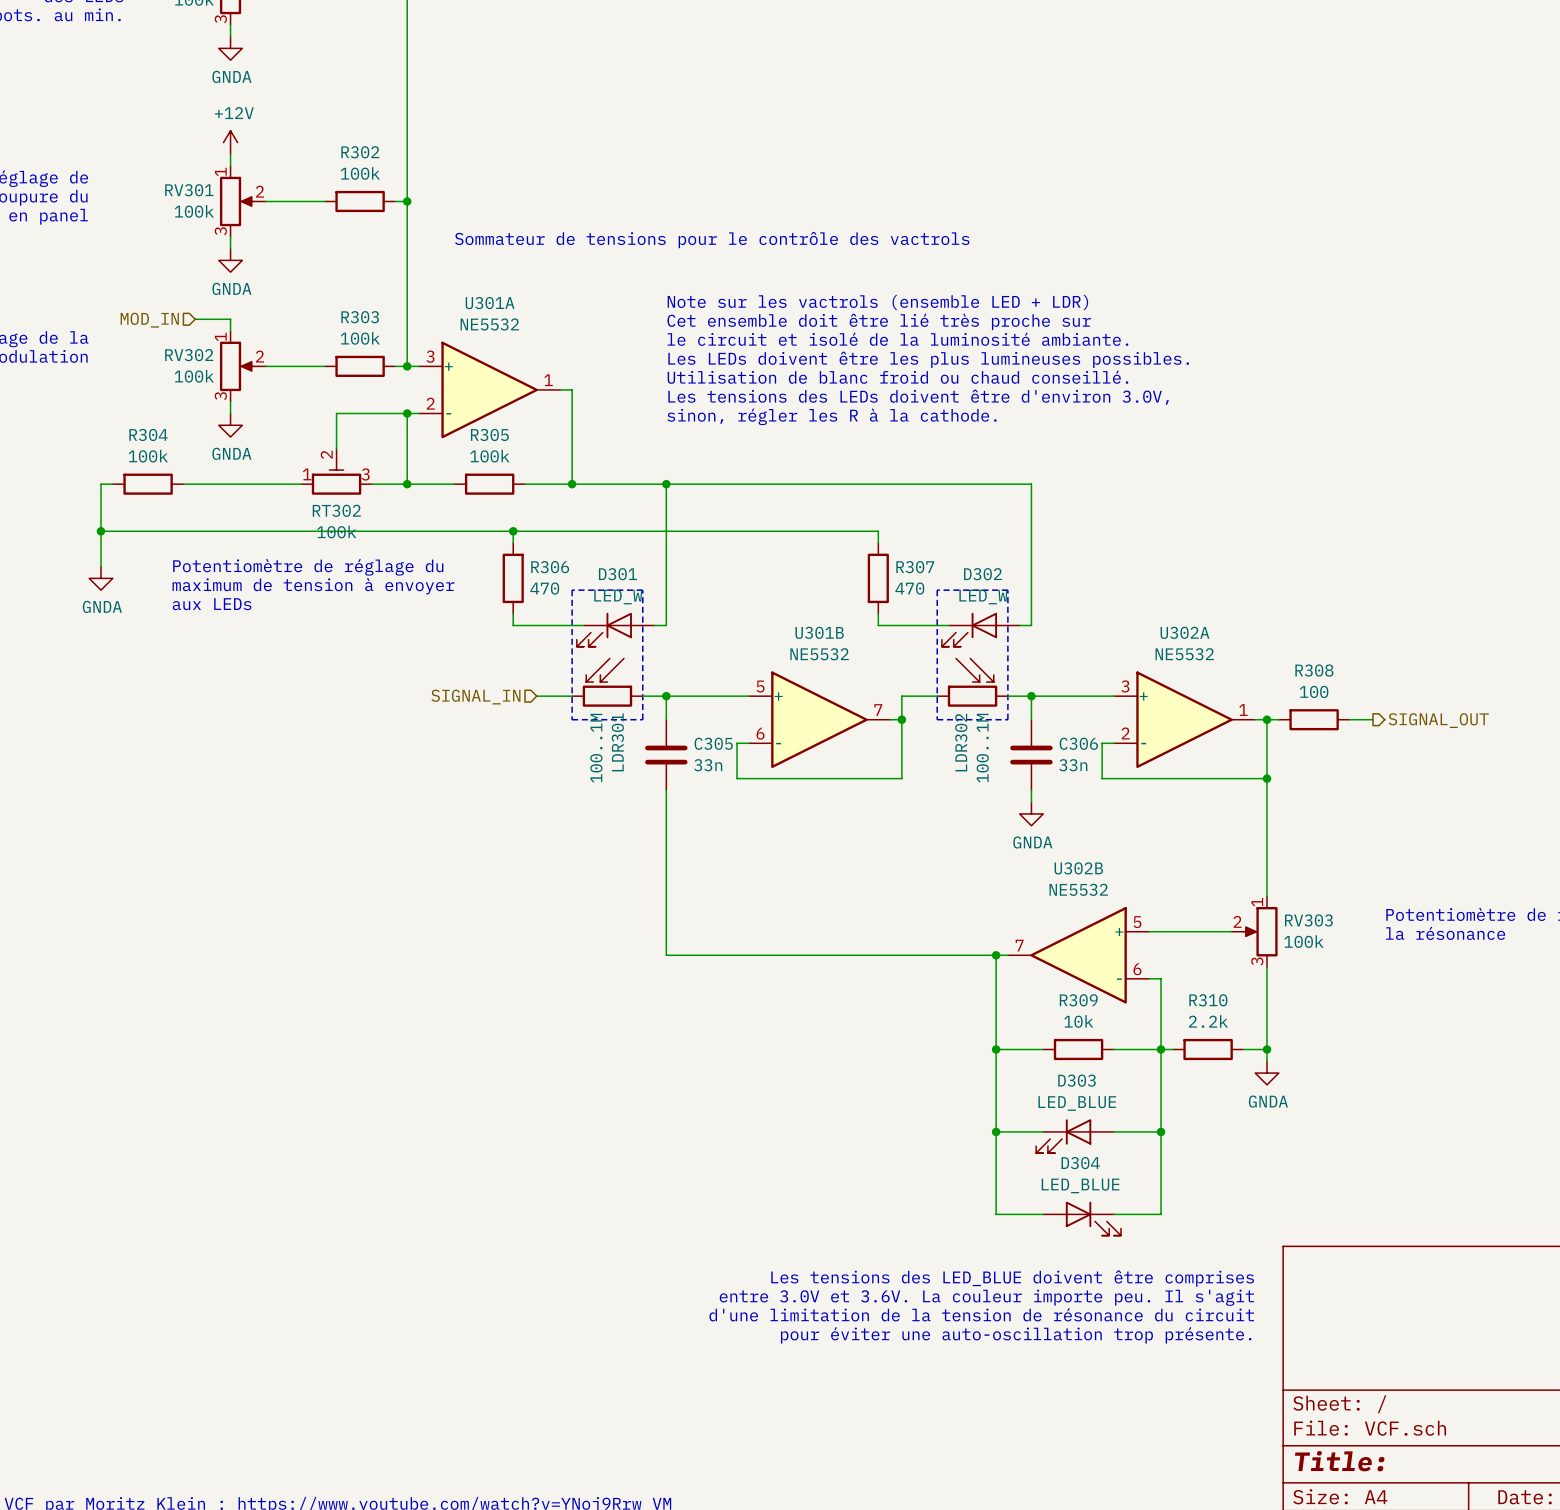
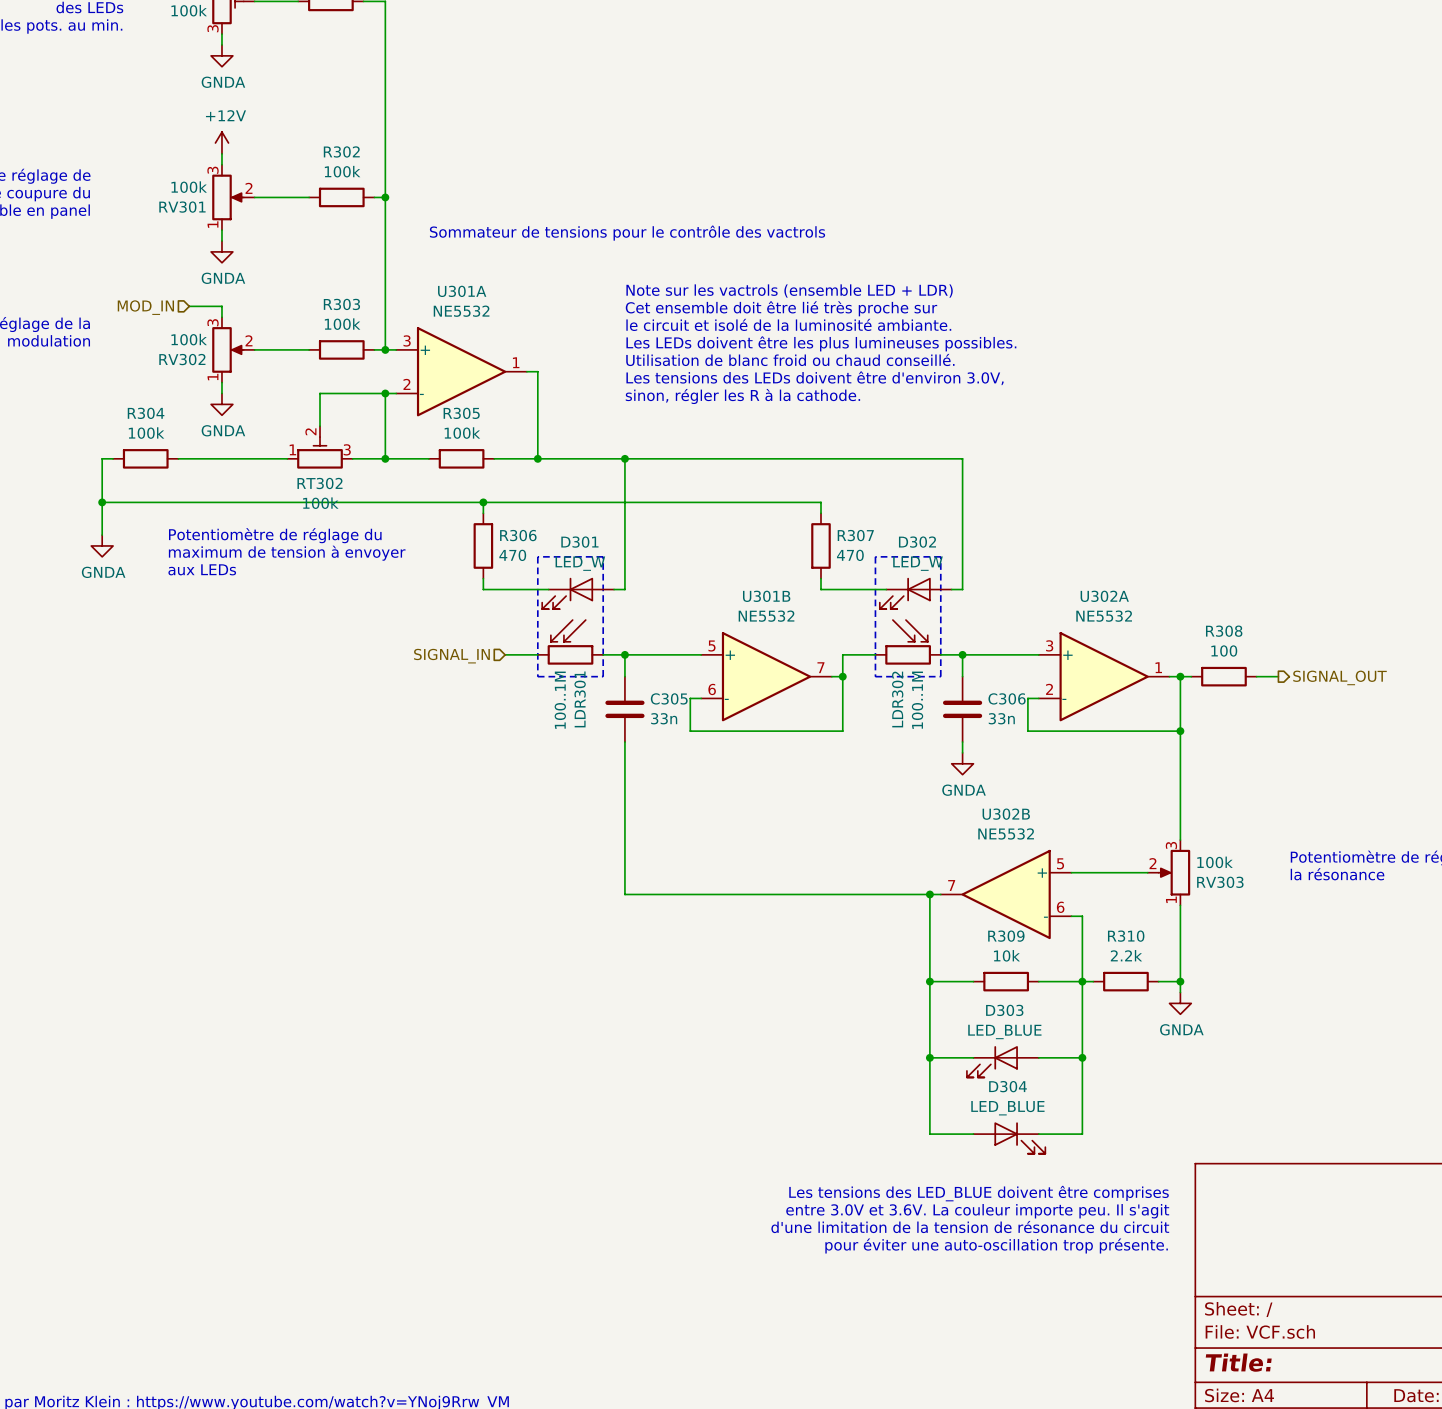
RV301 flip: as is (237, 201) -> up-down (227, 197)
RV302 flip: as is (237, 366) -> up-down (227, 349)
RV303 flip: as is (1260, 931) -> up-down (1174, 872)

